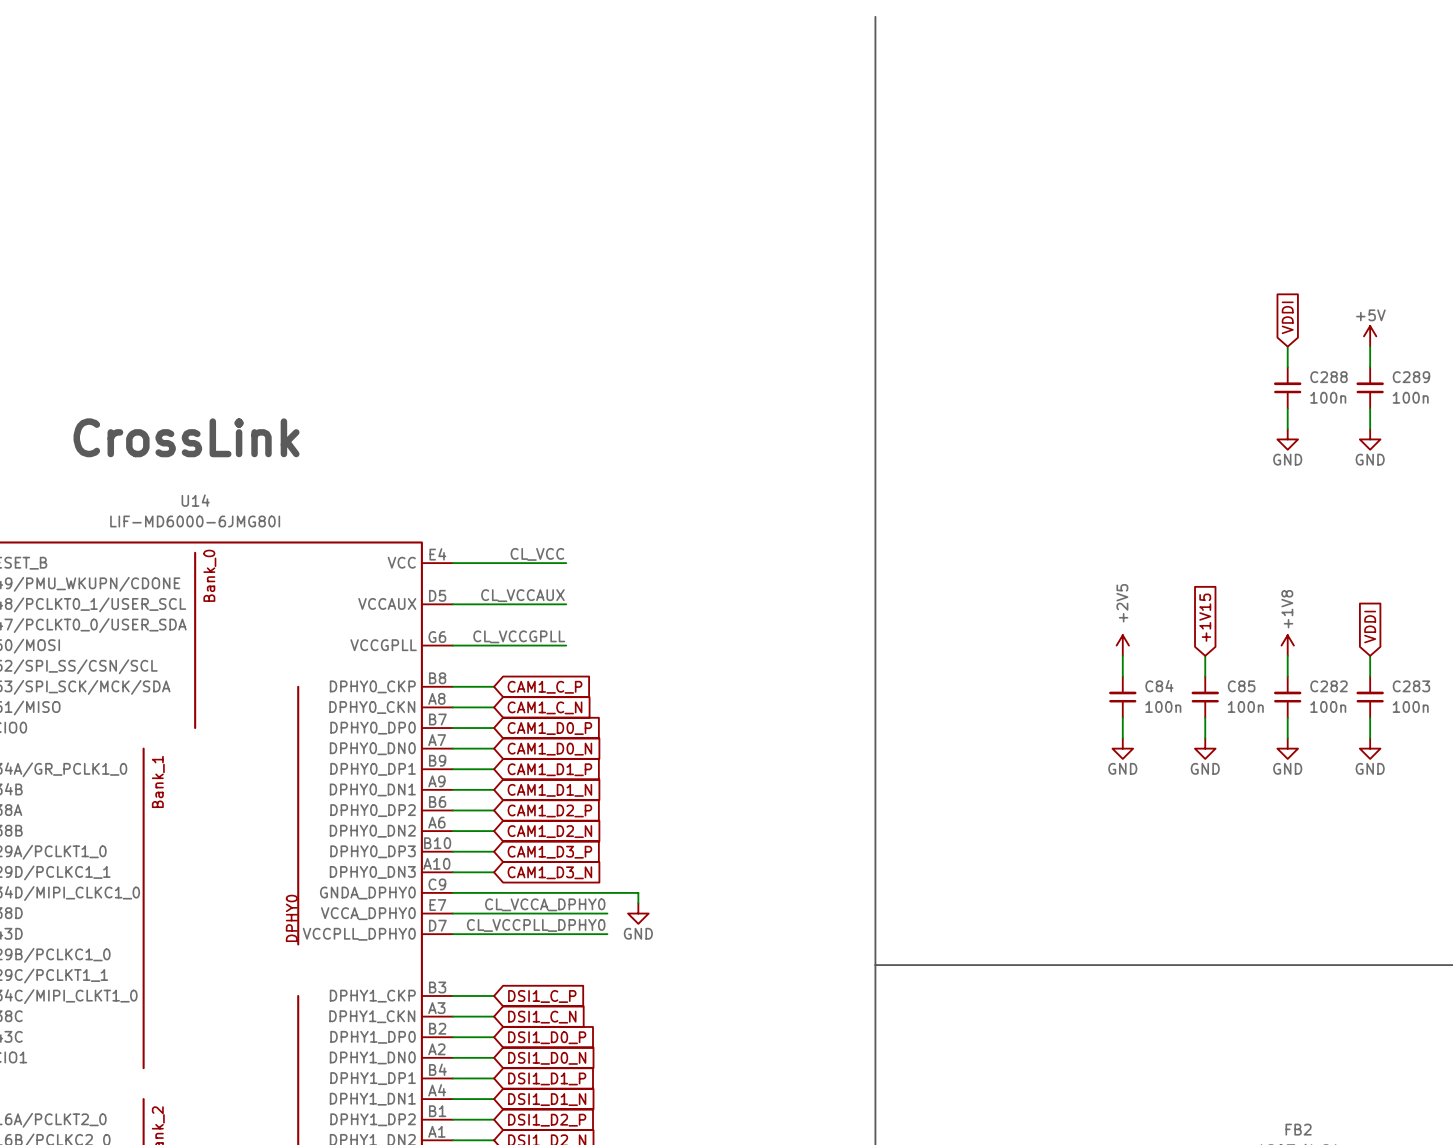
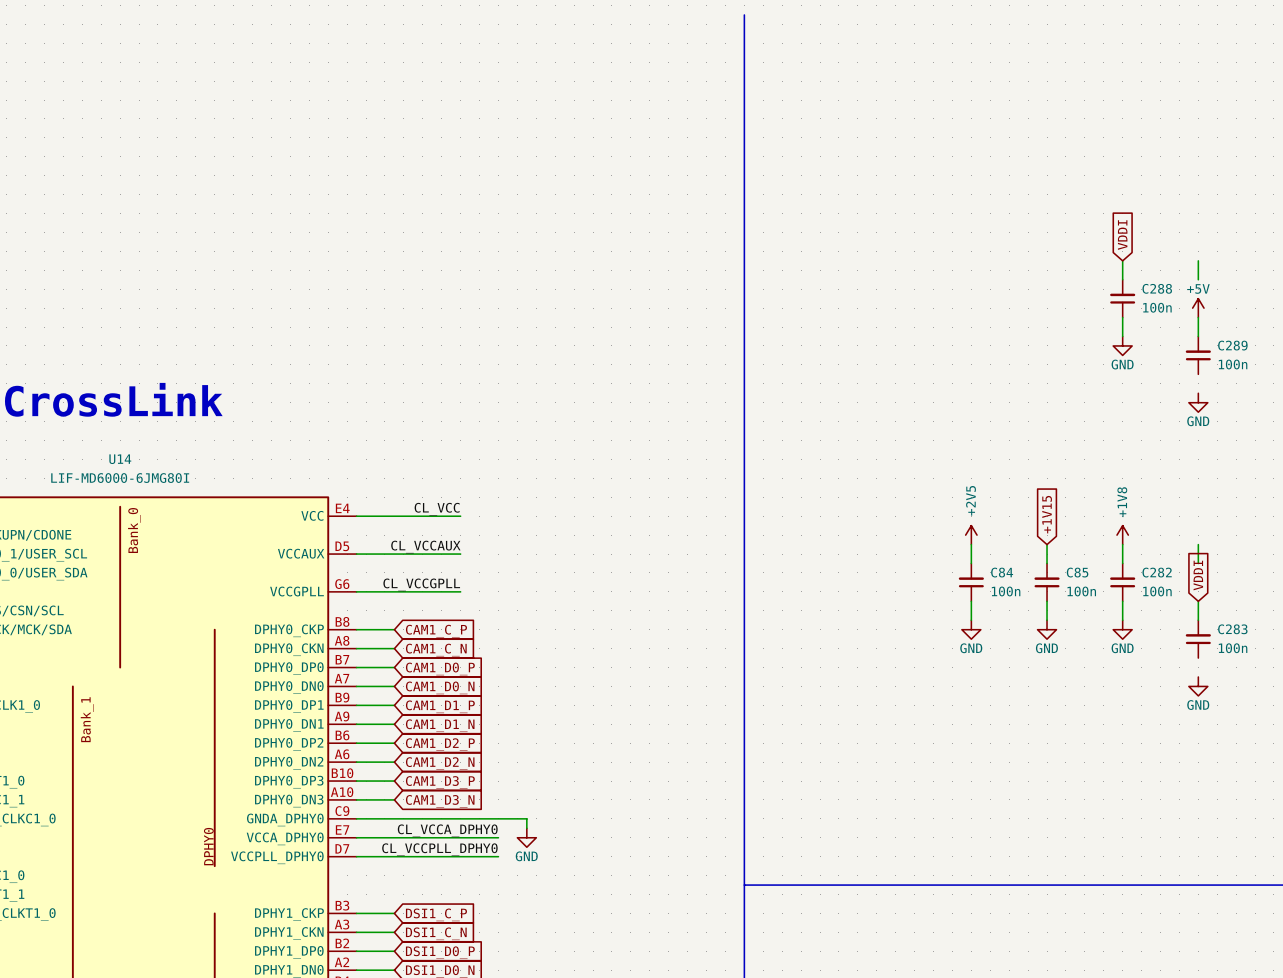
global label position: VDDI (1287, 317) -> VDDI (1122, 235)
C288 position: (1287, 387) -> (1122, 298)
wire: (1287, 408) (1287, 429) -> (1122, 260) (1122, 279)
wire: (1370, 408) (1370, 429) -> (1198, 260) (1198, 279)
power symbol position: GND (1287, 439) -> GND (1122, 345)
global label position: +1V15 (1205, 617) -> +1V15 (1047, 514)
power symbol position: +2V5 (1122, 645) -> +2V5 (971, 535)
power symbol position: +1V8 (1287, 645) -> +1V8 (1122, 535)
power symbol: none -> GND (971, 629)
power symbol: none -> GND (1047, 629)
power symbol: none -> GND (1122, 629)
C84 position: (1122, 697) -> (971, 582)
C85 position: (1205, 697) -> (1047, 582)
C282 position: (1287, 697) -> (1122, 582)
wire: (1122, 717) (1122, 738) -> (971, 544) (971, 563)
wire: (1205, 717) (1205, 738) -> (1047, 544) (1047, 563)
wire: (1287, 717) (1287, 738) -> (1122, 544) (1122, 563)
wire: (1370, 717) (1370, 738) -> (1198, 544) (1198, 563)
power symbol: GND (1122, 748) -> none
power symbol: GND (1205, 748) -> none
power symbol: GND (1287, 748) -> none

